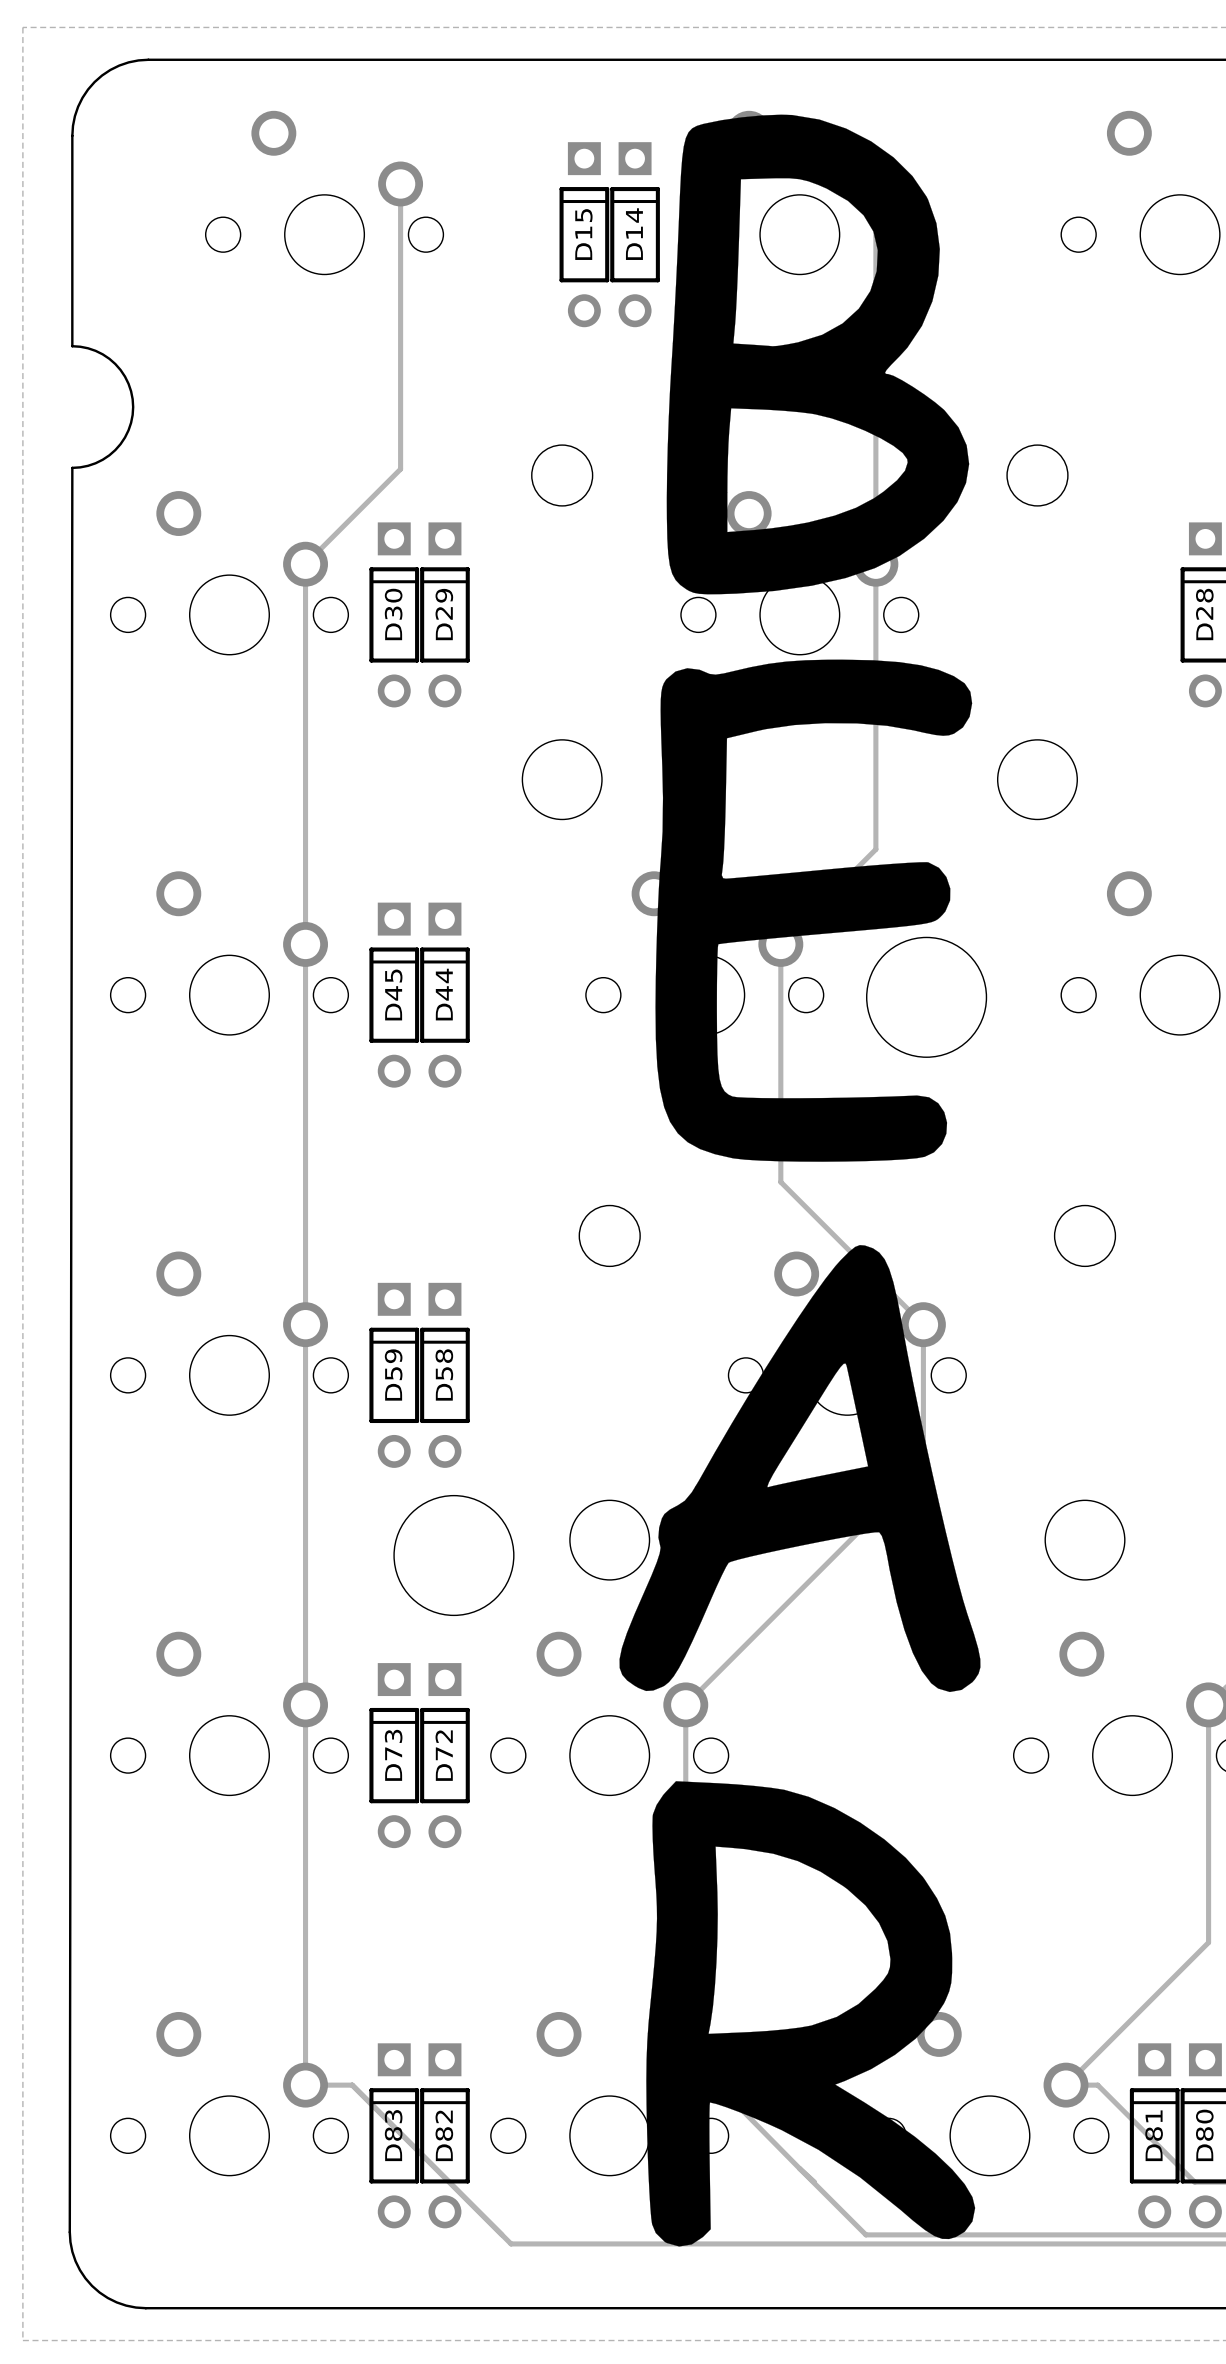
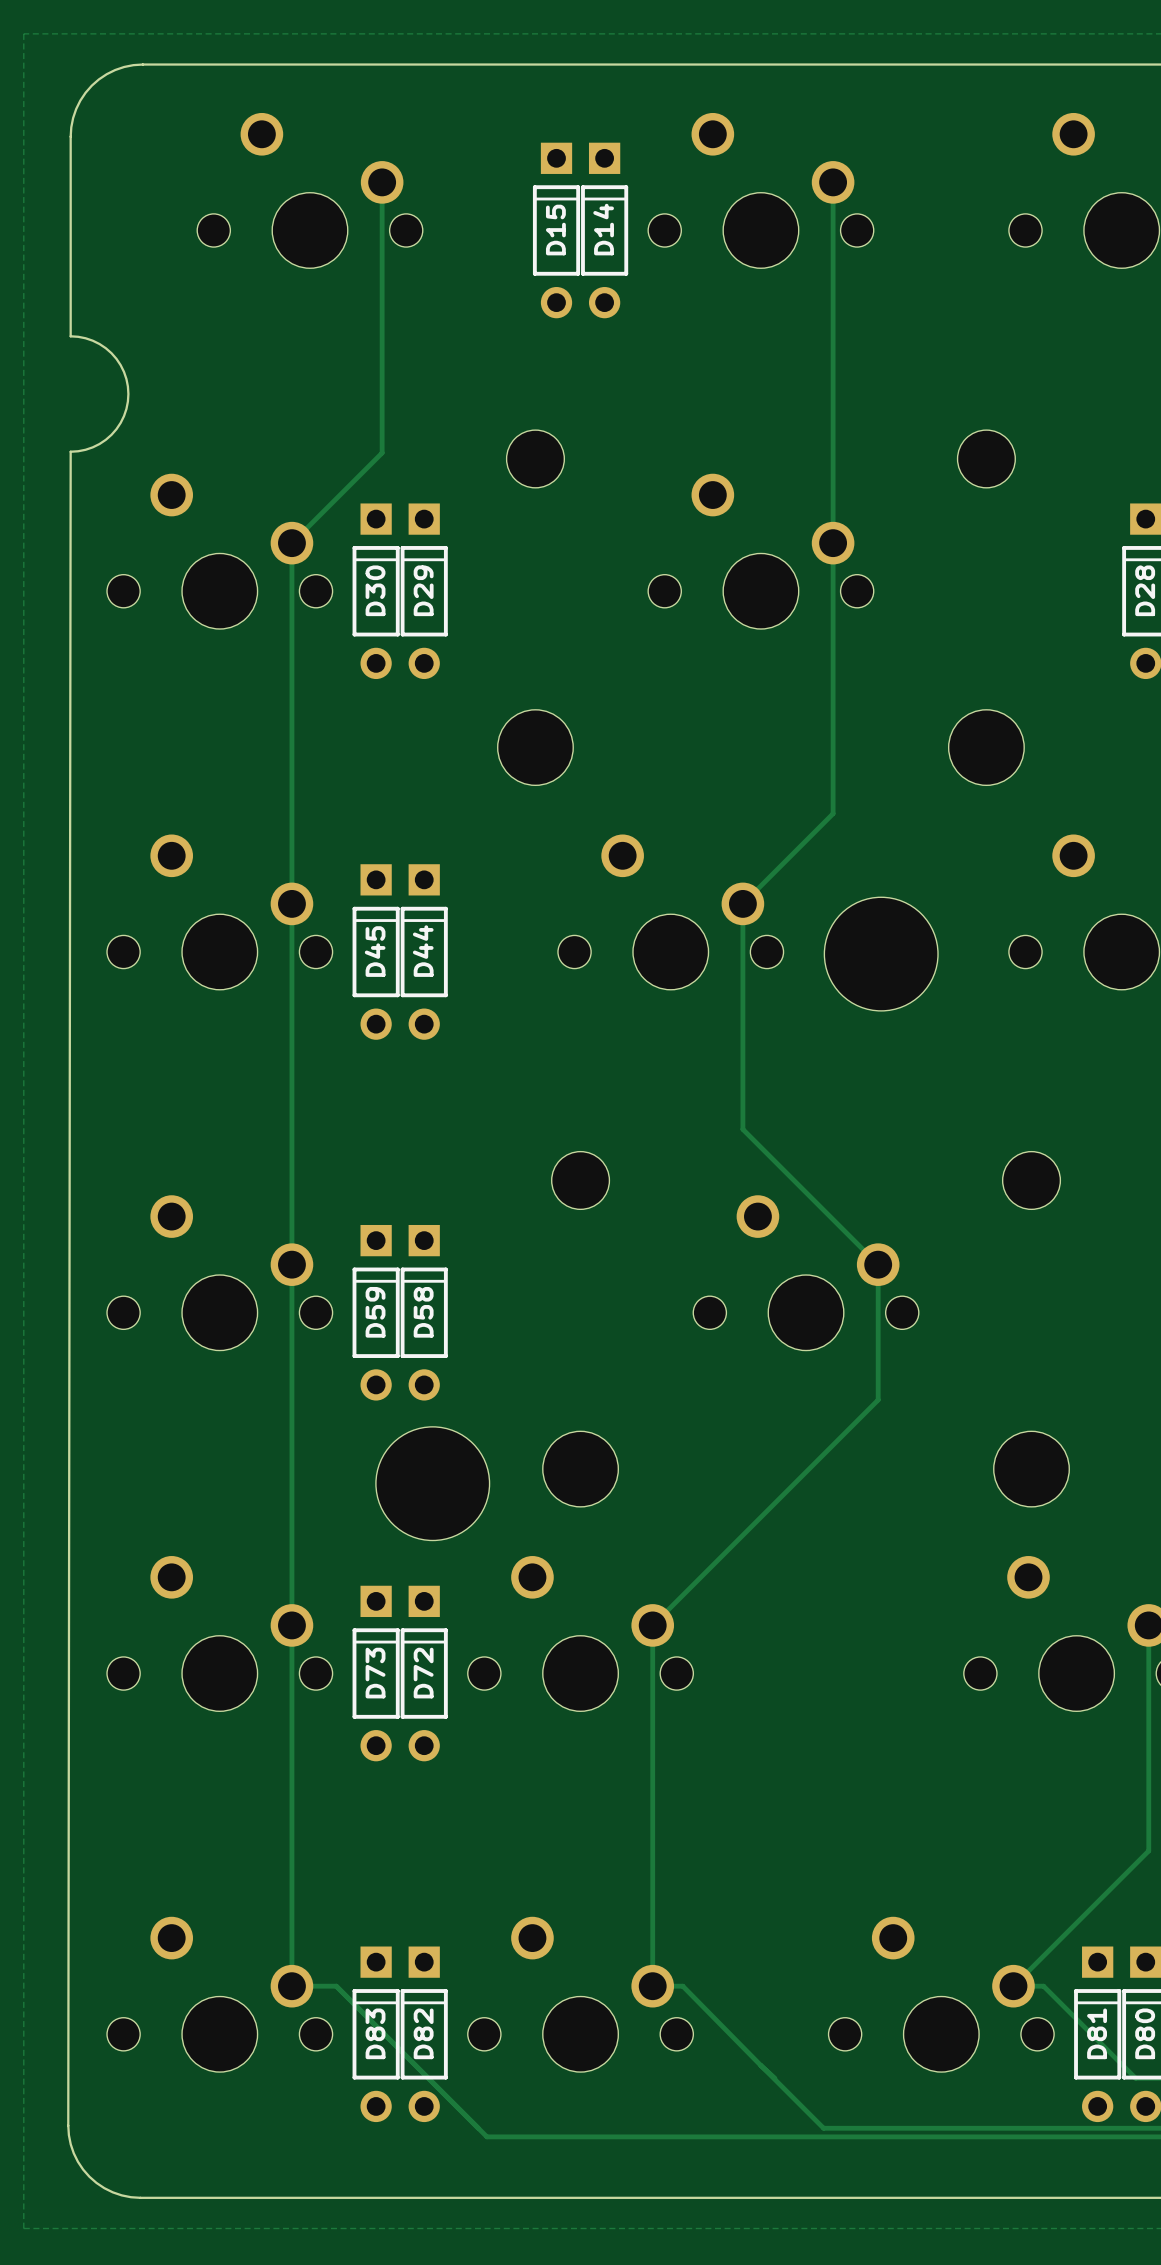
drawing: [619, 114, 981, 2247] -> none

